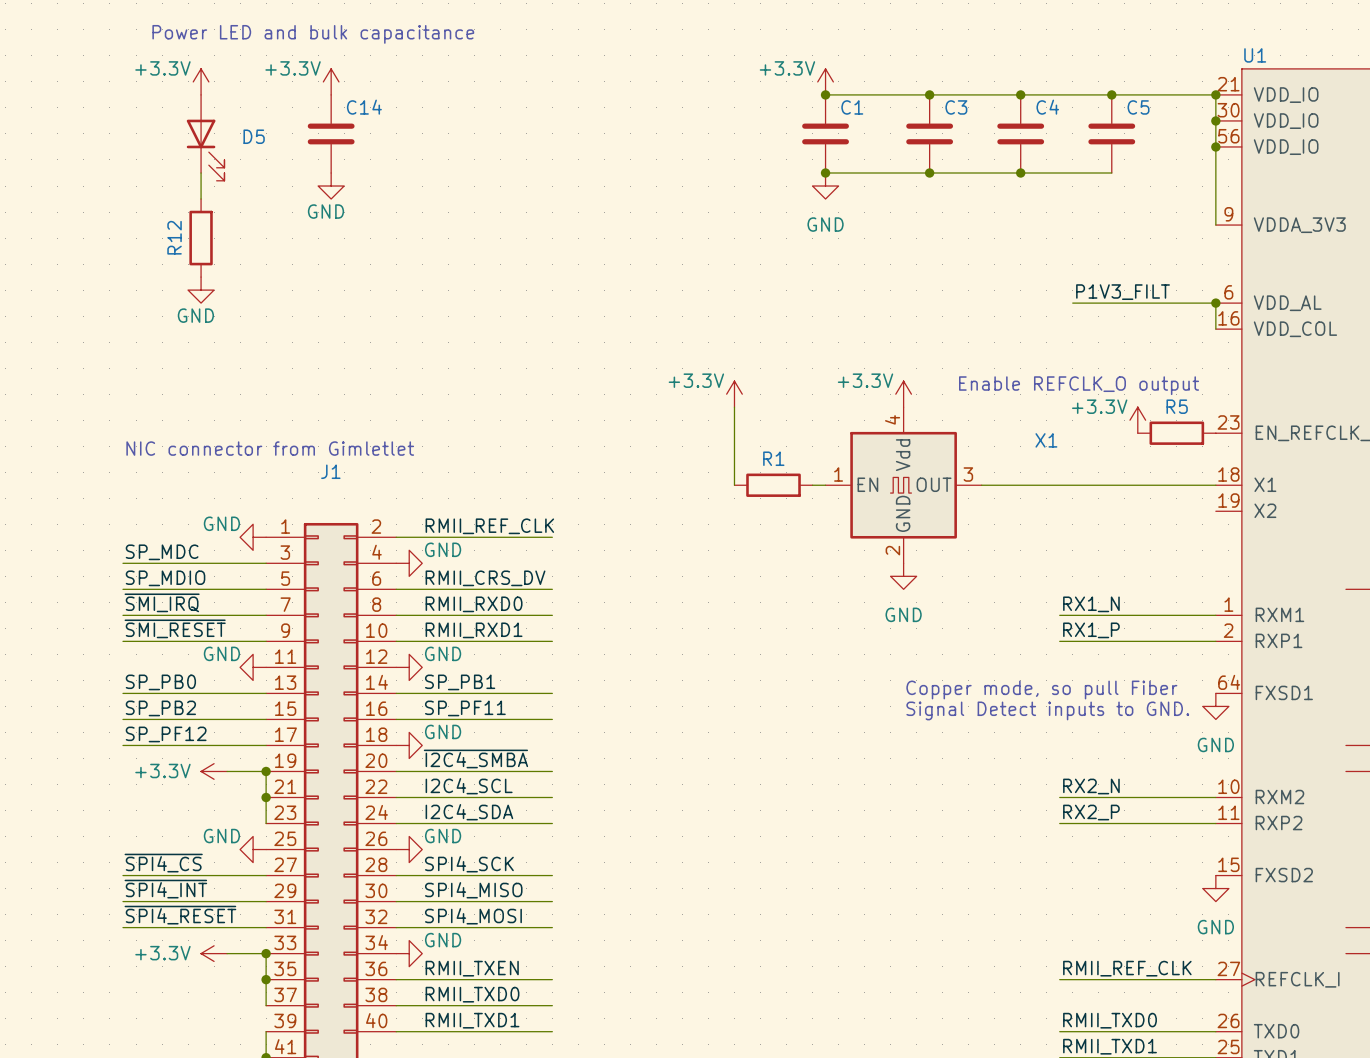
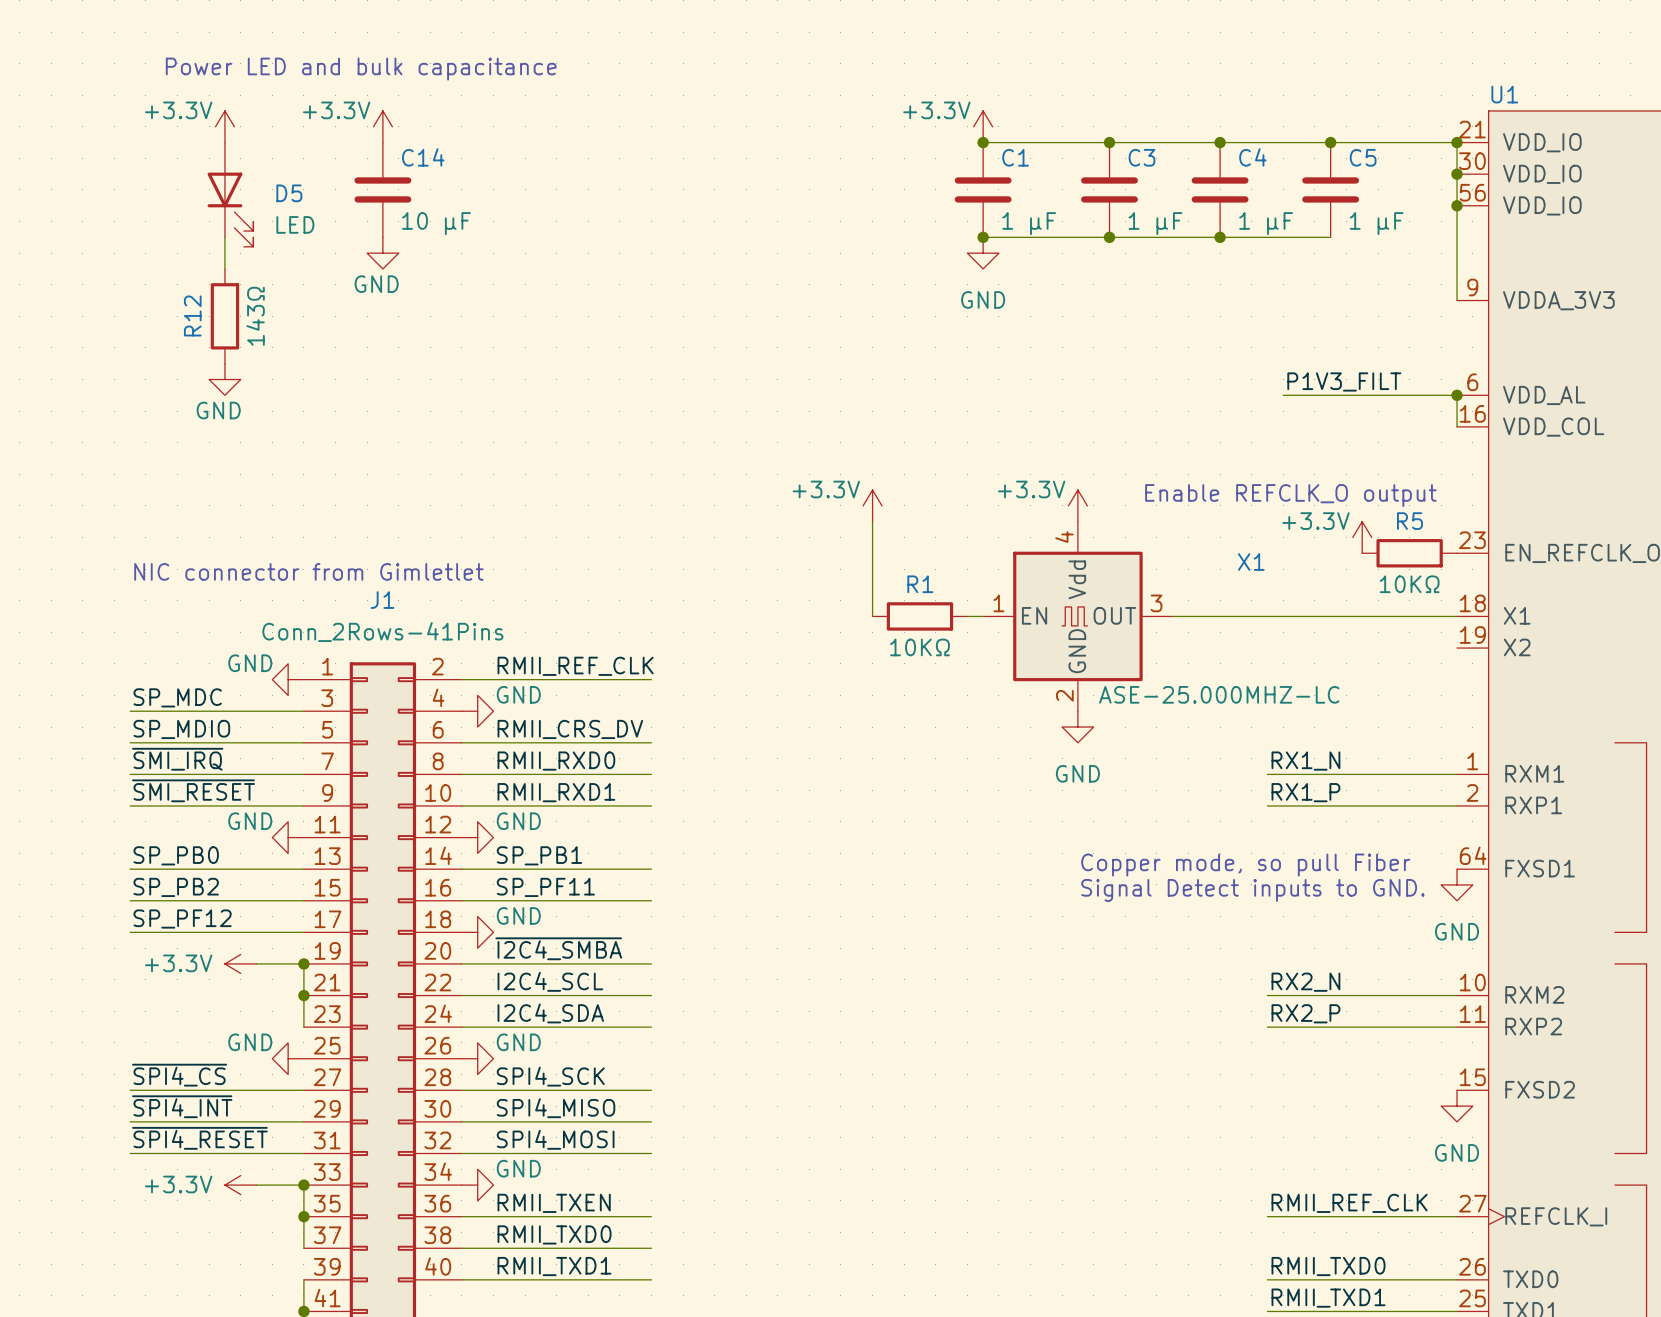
C14 value: none -> 10 µF (436, 223)
C1 value: none -> 1 µF (1029, 223)
C3 value: none -> 1 µF (1155, 223)
C4 value: none -> 1 µF (1266, 223)
C5 value: none -> 1 µF (1376, 223)
D5 value: none -> LED (295, 224)
R12 value: none -> 143Ω (255, 316)
R5 value: none -> 10KΩ (1409, 584)
J1 value: none -> Conn_2Rows-41Pins (382, 632)
R1 value: none -> 10KΩ (919, 647)
X1 value: none -> ASE-25.000MHZ-LC (1219, 694)

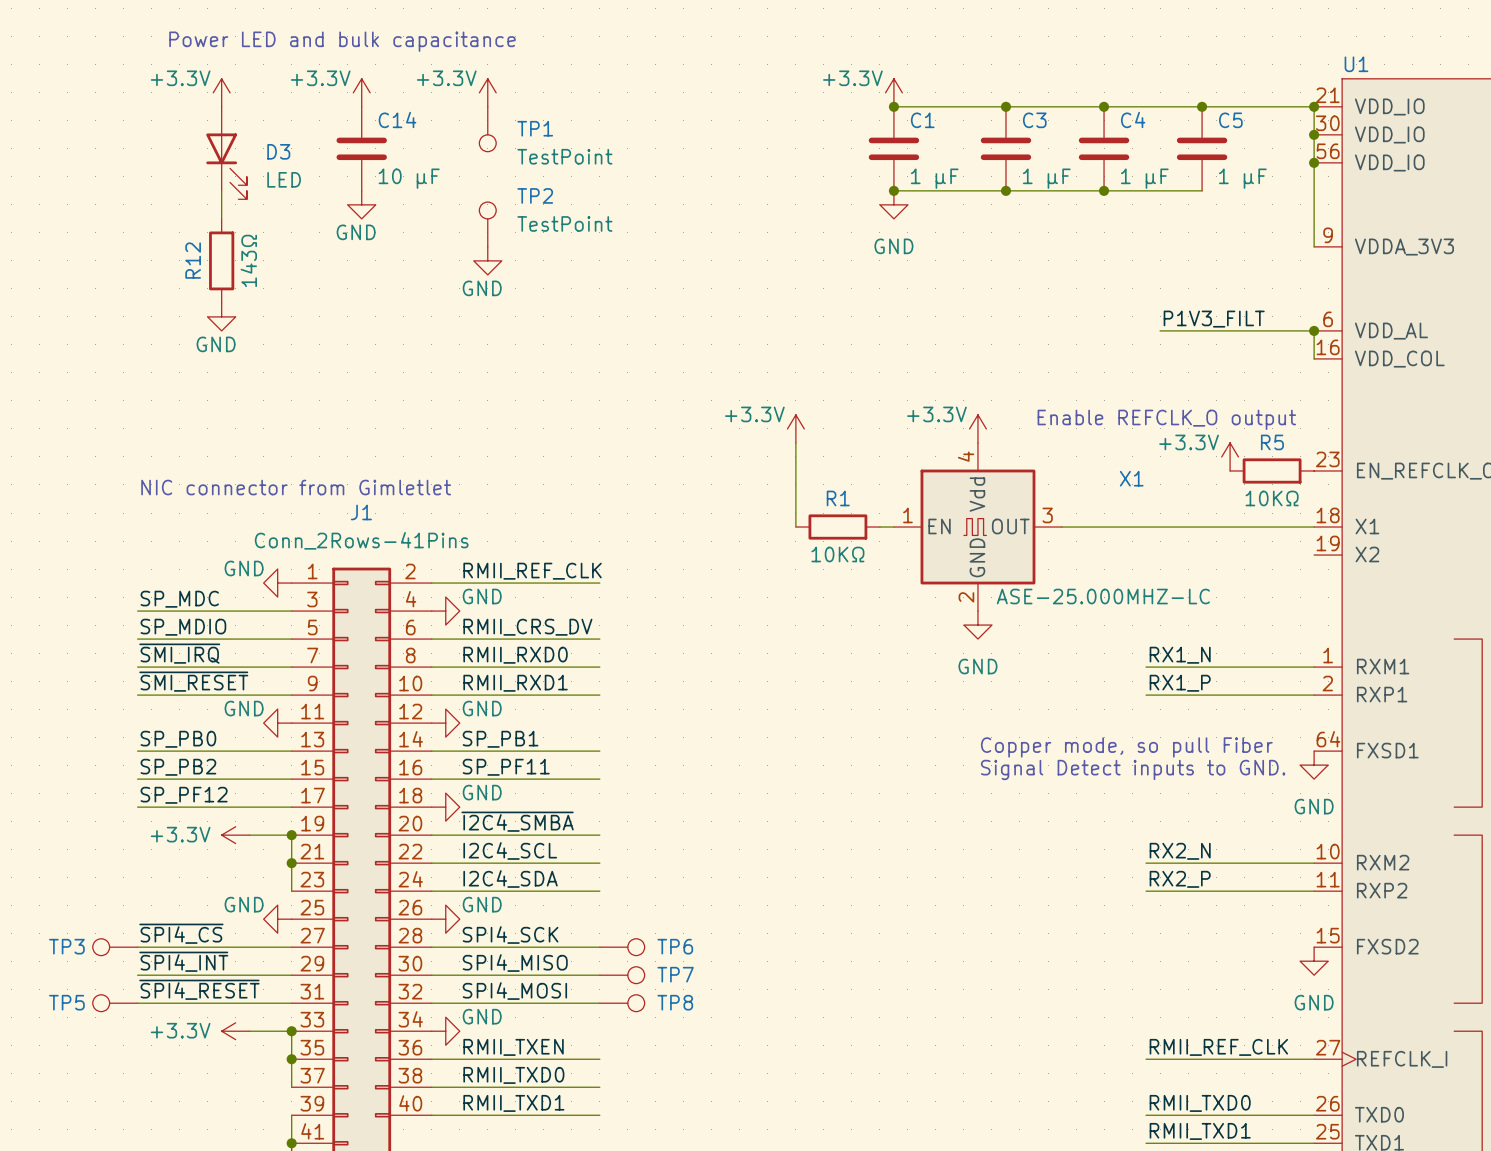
power symbol: none -> +3.3V (487, 92)
TP1: none -> TestPoint (487, 129)
D5 name: D5 (289, 193) -> D3 (278, 151)
TP2: none -> TestPoint (487, 224)
power symbol: none -> GND (487, 260)
TP3: none -> (115, 947)
TP6: none -> (622, 947)
TP7: none -> (622, 975)
TP5: none -> (115, 1003)
TP8: none -> (622, 1003)

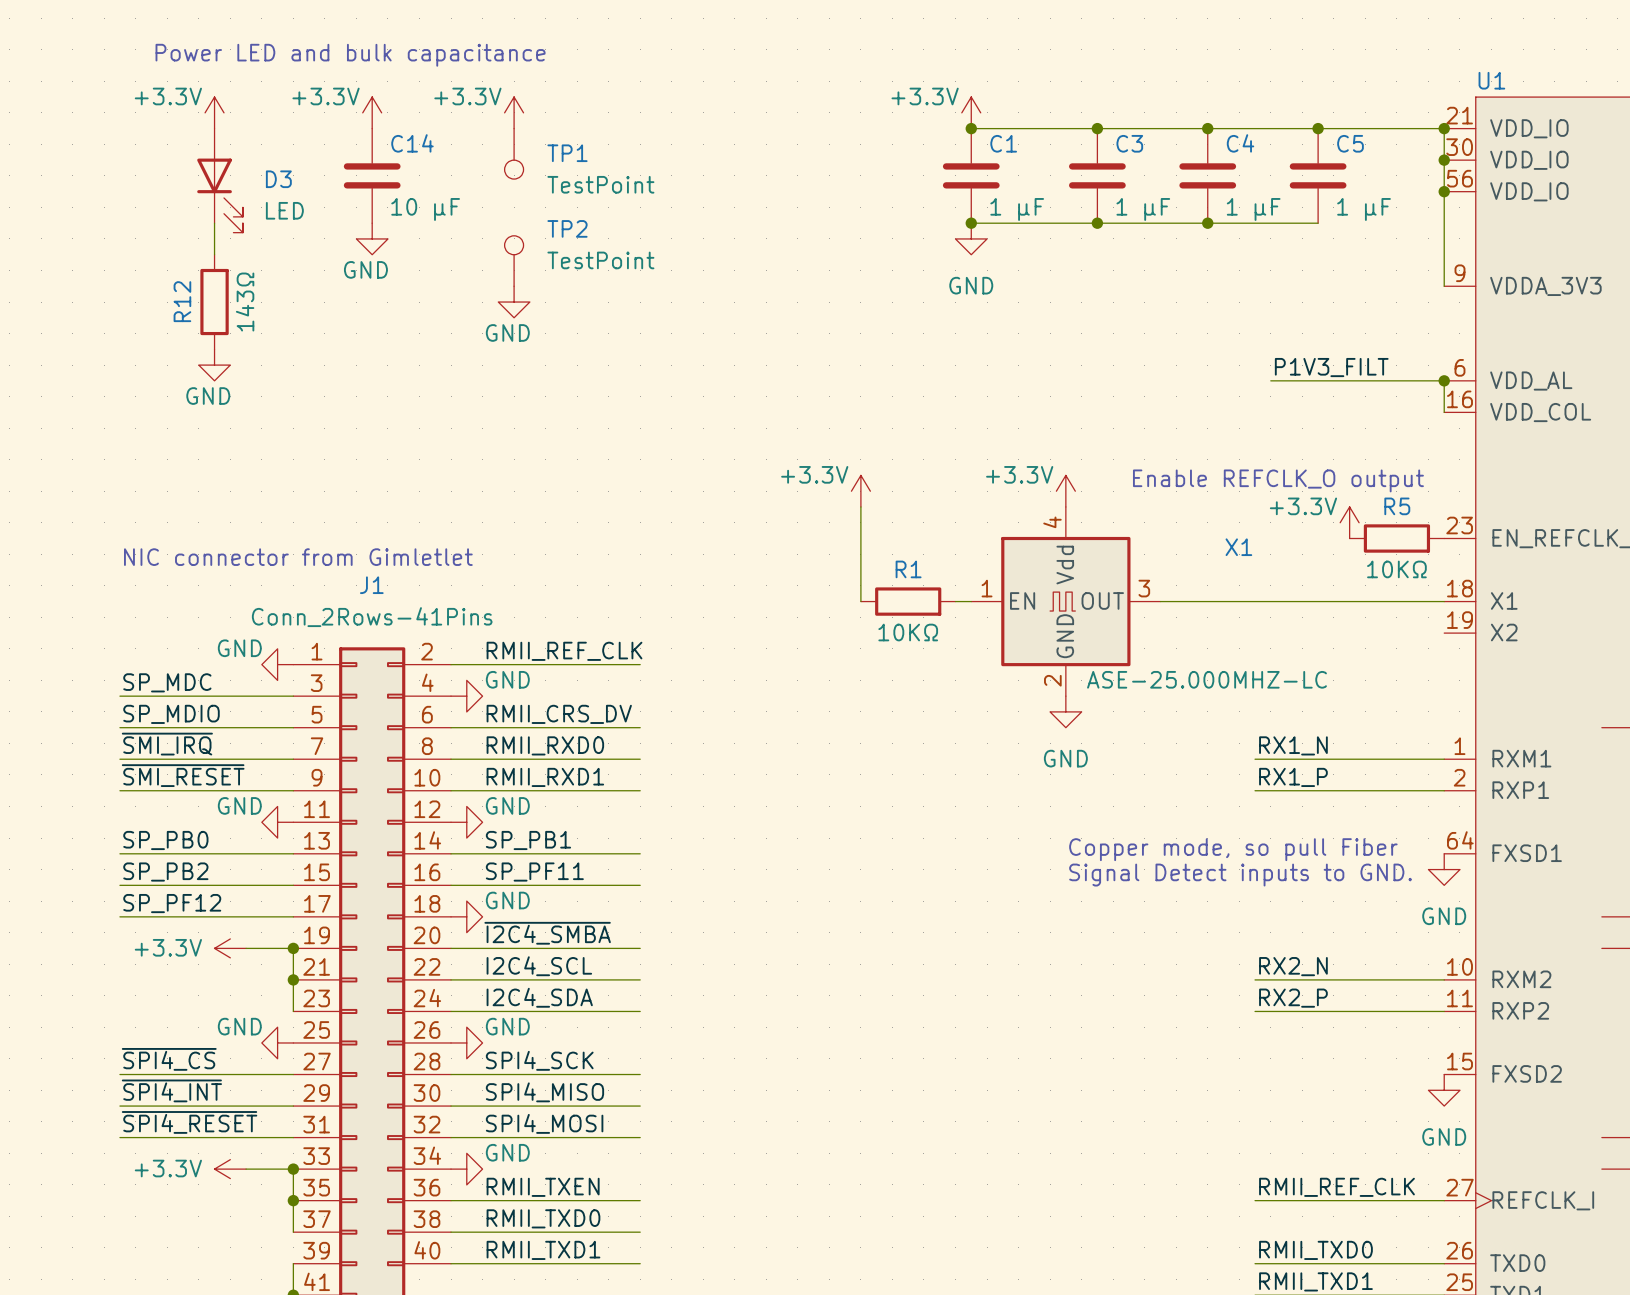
TP3: (115, 947) -> none
TP6: (622, 947) -> none
TP7: (622, 975) -> none
TP5: (115, 1003) -> none
TP8: (622, 1003) -> none

